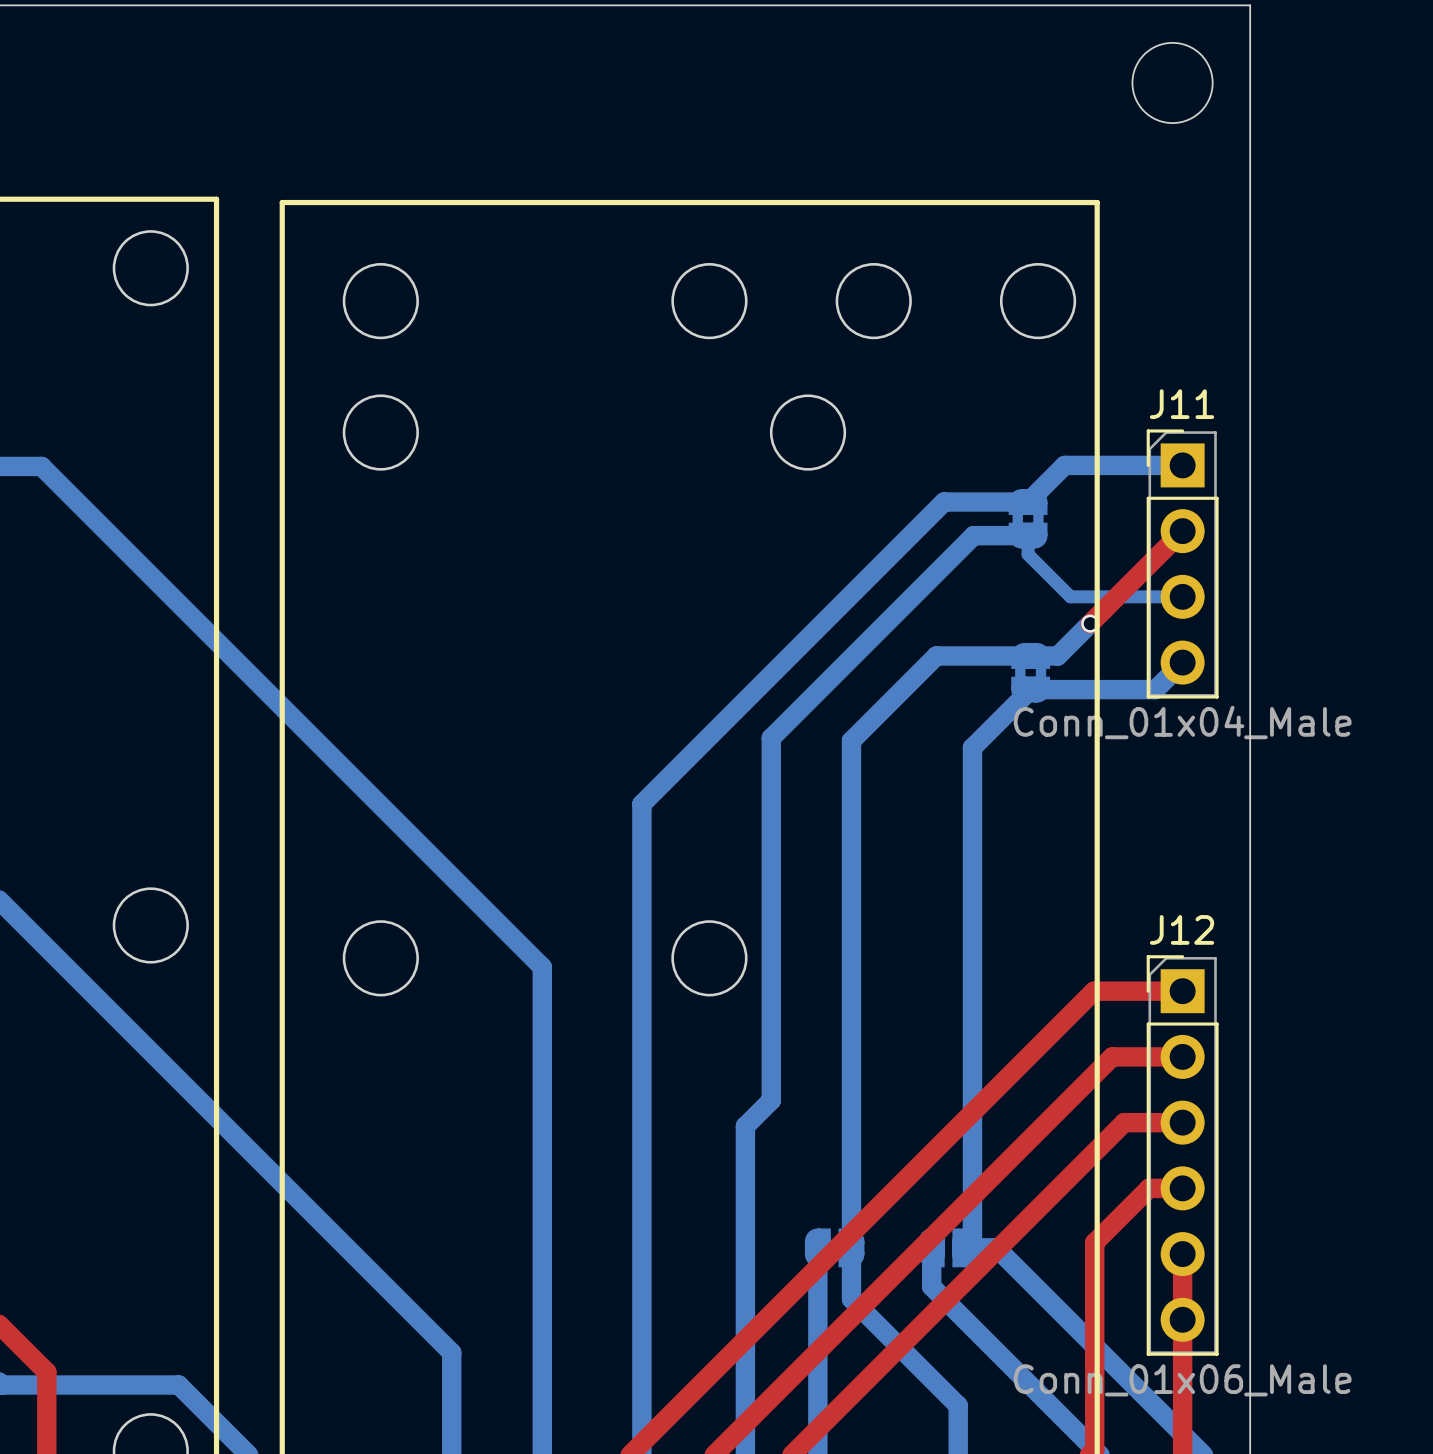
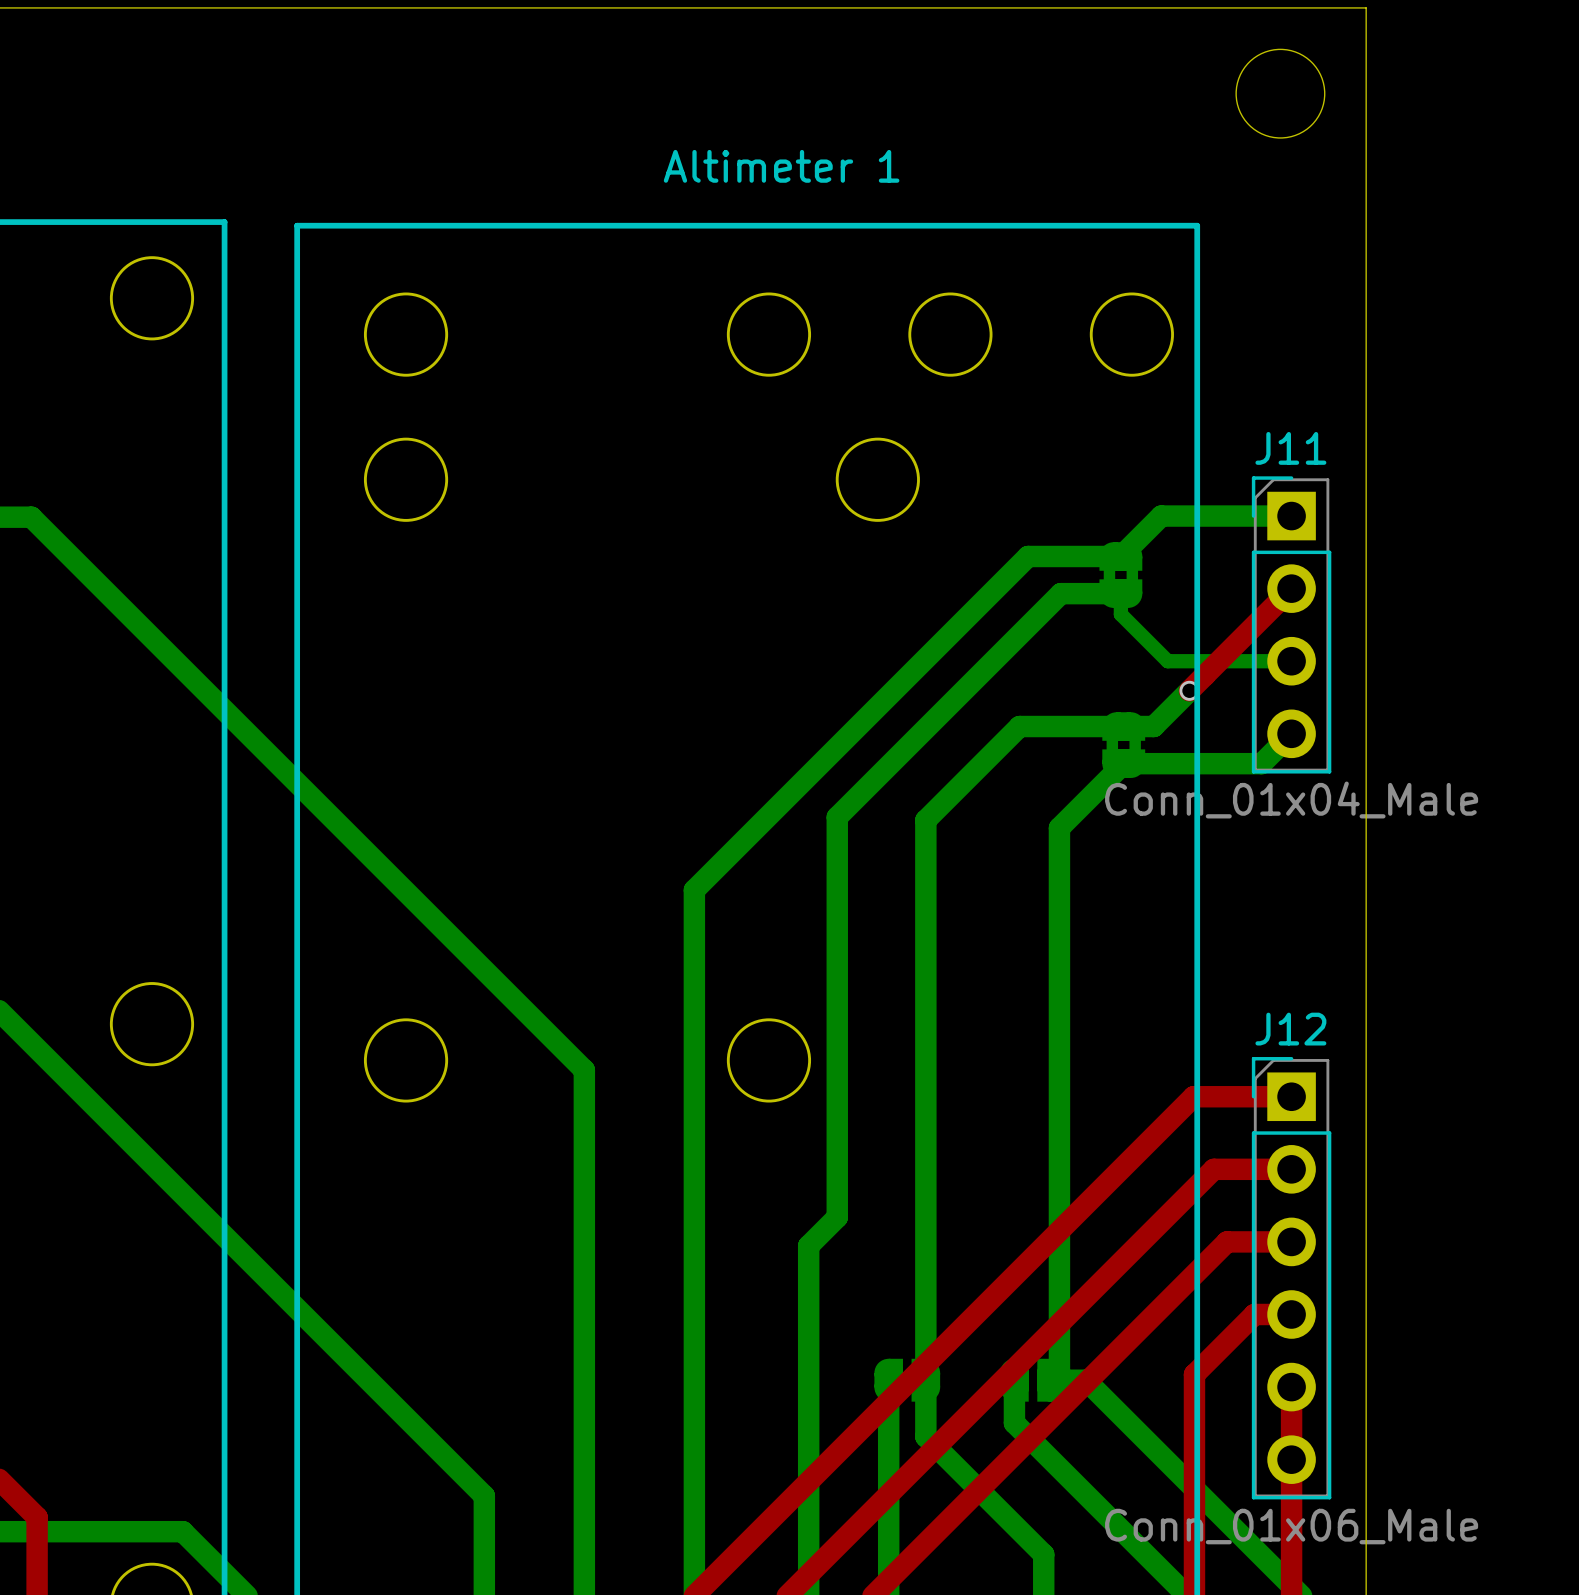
text: none -> Altimeter 1 (781, 166)

